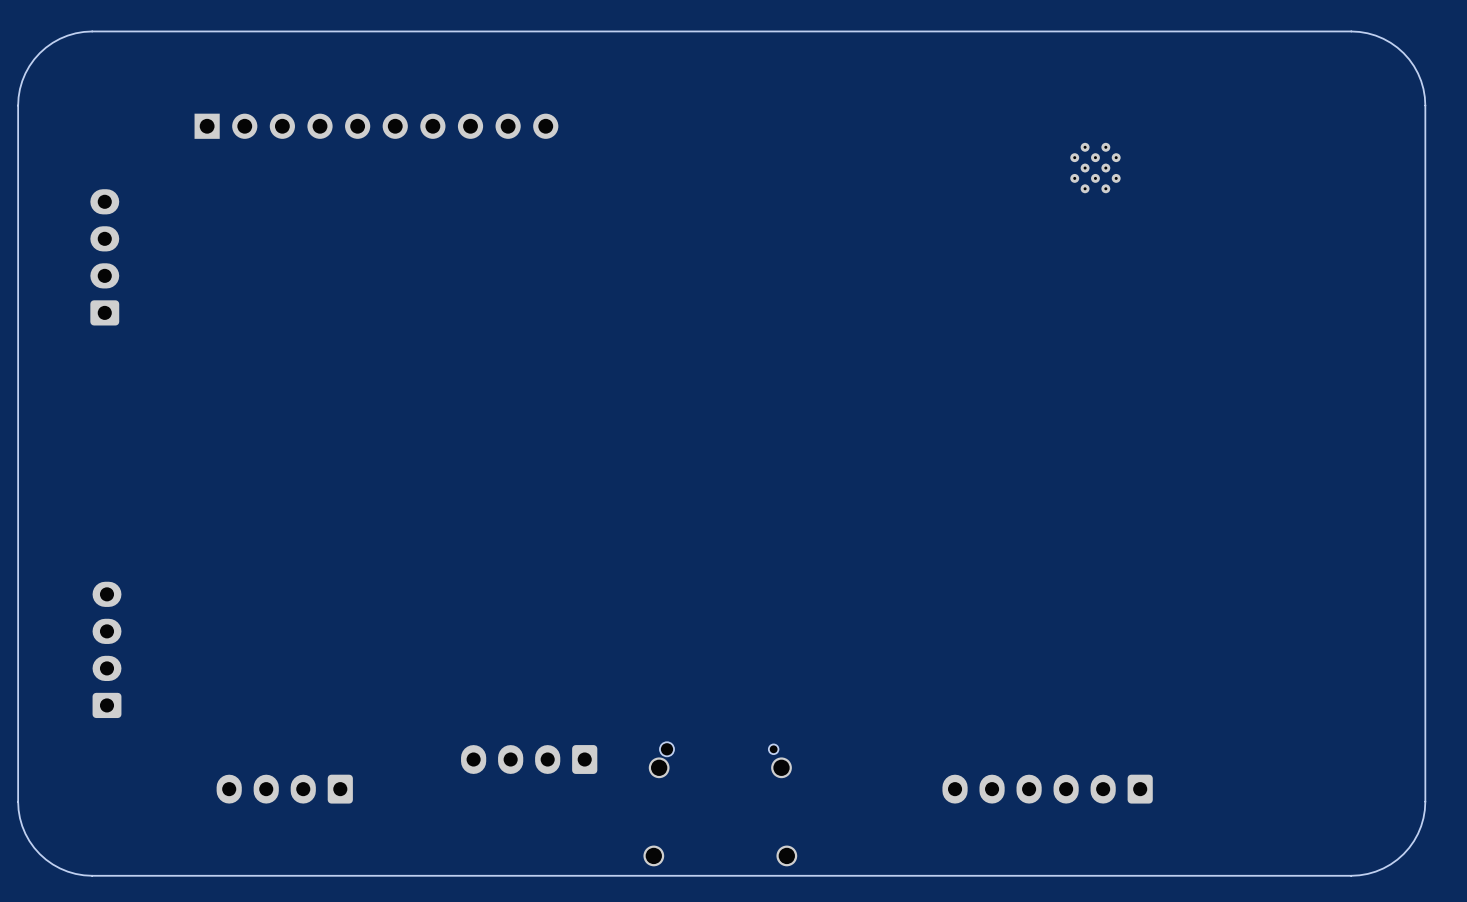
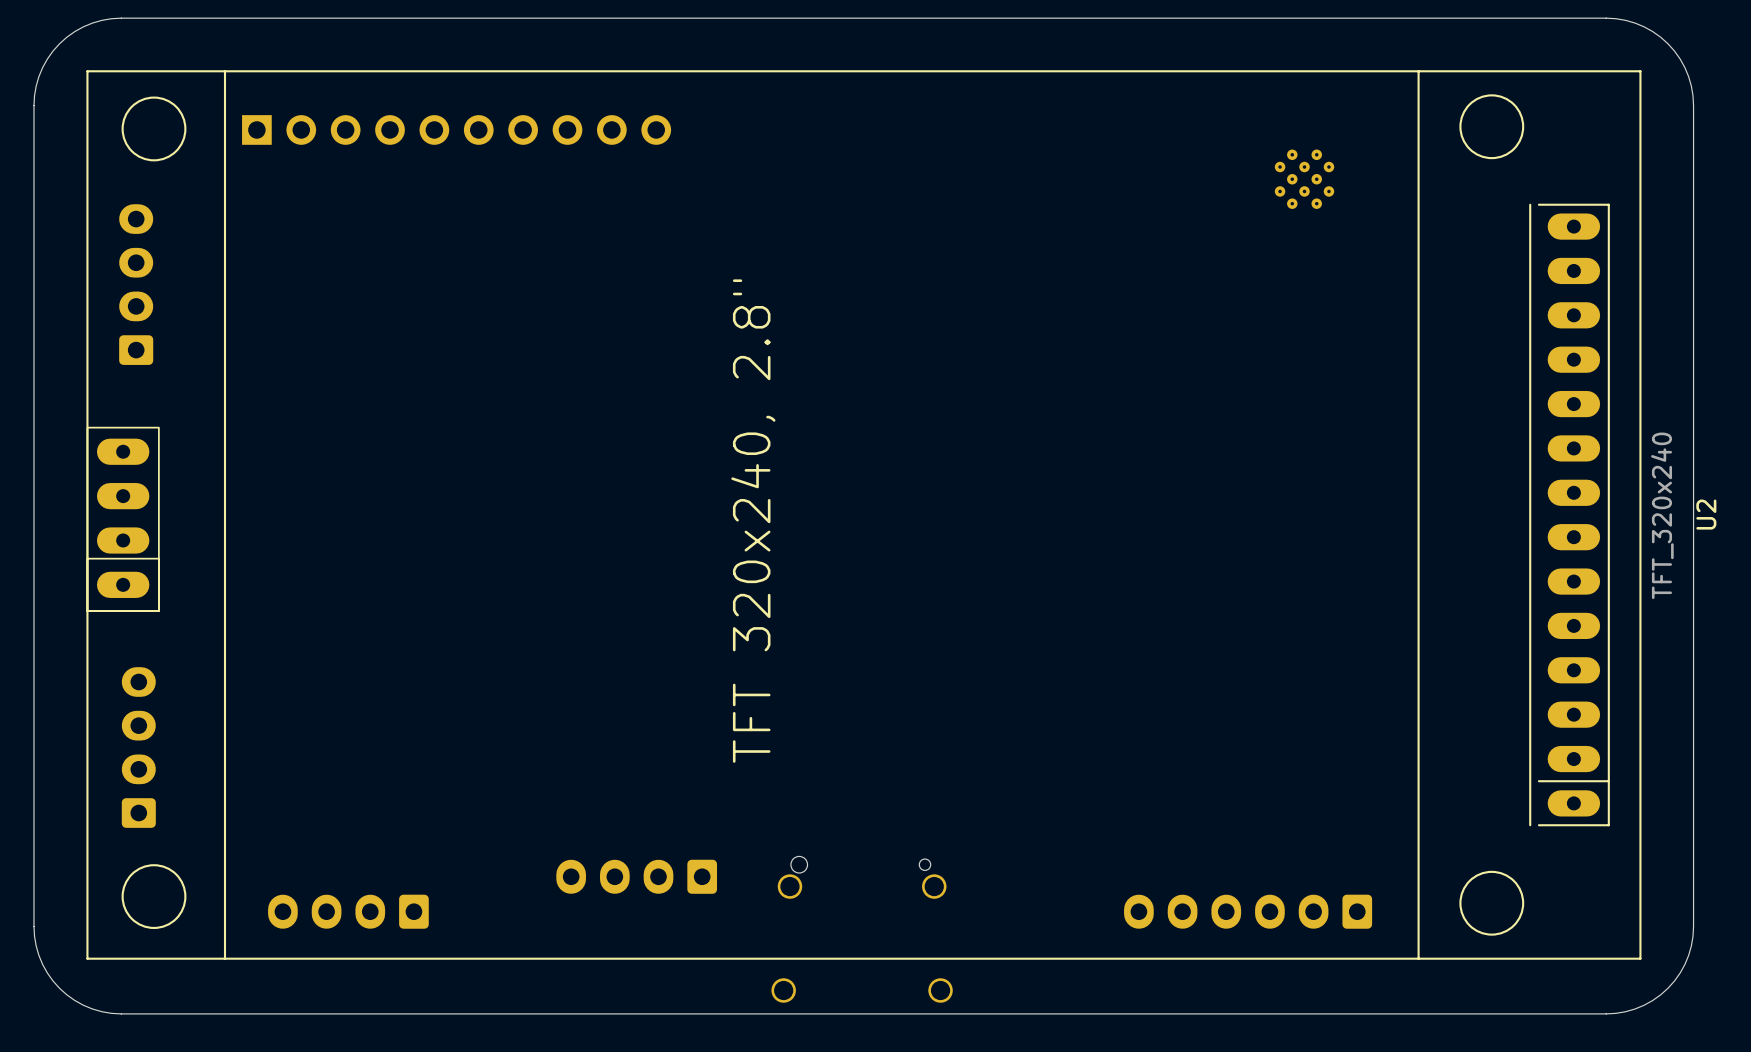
U2: none -> TFT_320x240 (863, 514)

